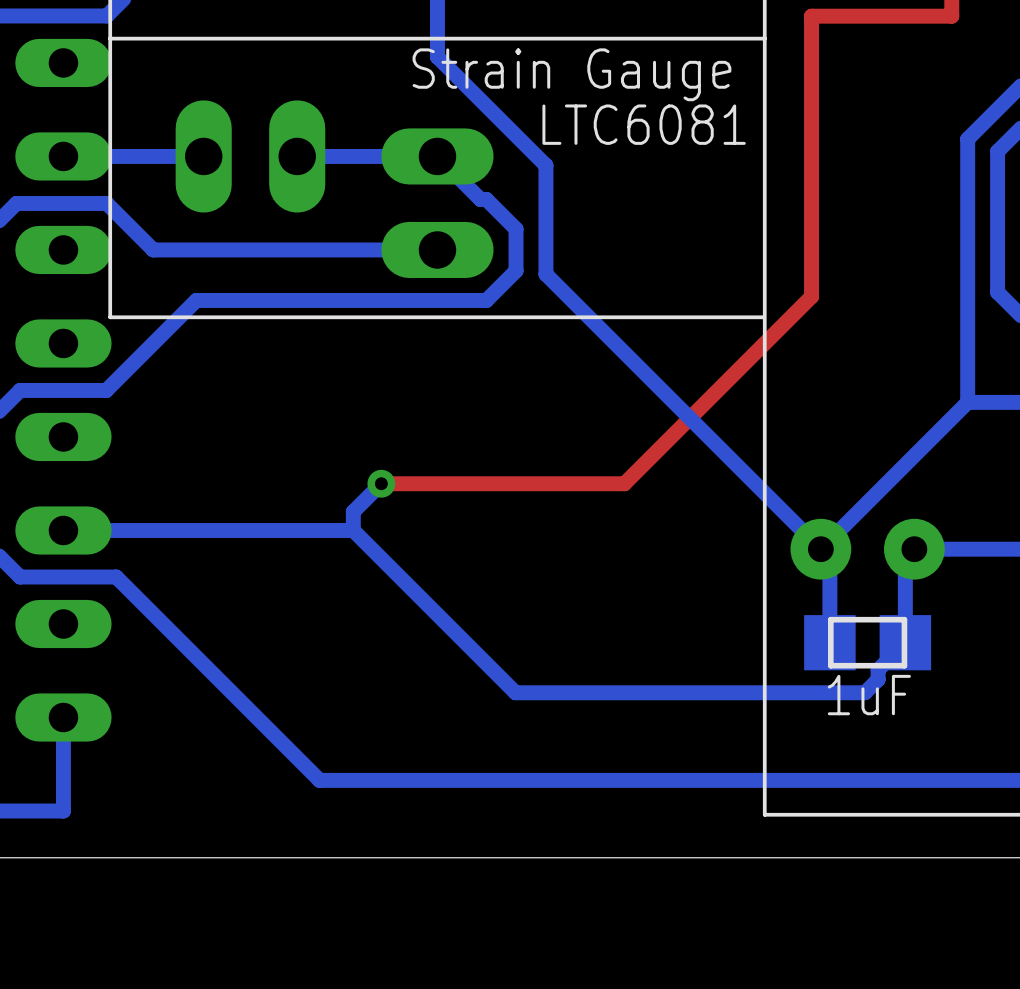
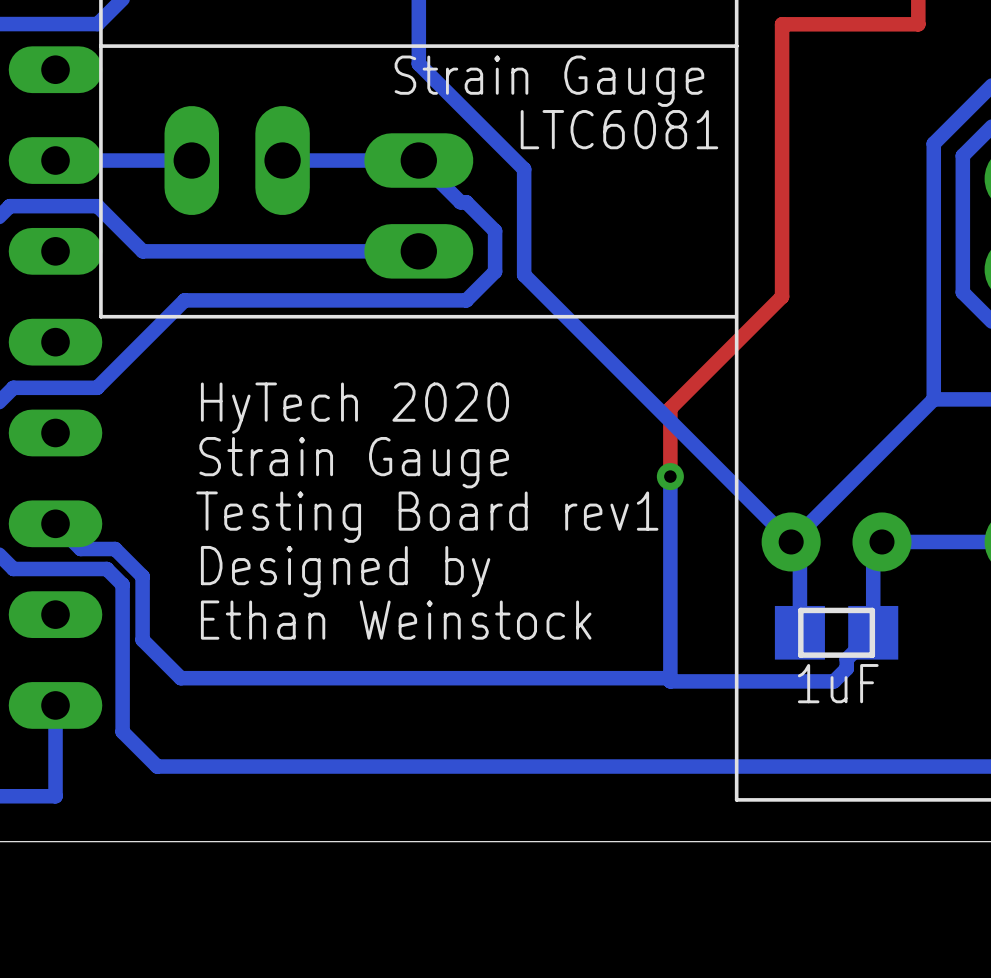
text: none -> HyTech 2020 (354, 408)
top track: (696, 411) (624, 483) (381, 483) -> (670, 408) (670, 476)
text: none -> Strain Gauge (354, 462)
via: none -> (670, 476)
bottom track: (381, 483) (353, 511) (353, 530) -> none
via: (381, 483) -> none
text: none -> Testing Board rev1 (427, 517)
bottom track: (353, 530) (515, 692) (696, 692) -> (670, 476) (670, 681)
bottom track: (353, 530) (63, 530) -> (670, 678) (180, 678) (142, 639) (142, 576) (115, 549) (80, 549) (55, 523)
text: none -> Designed by (345, 571)
bottom track: (132, 593) (319, 780) -> (122, 584) (122, 731) (157, 766) (304, 766)
text: none -> Ethan Weinstock (396, 620)

